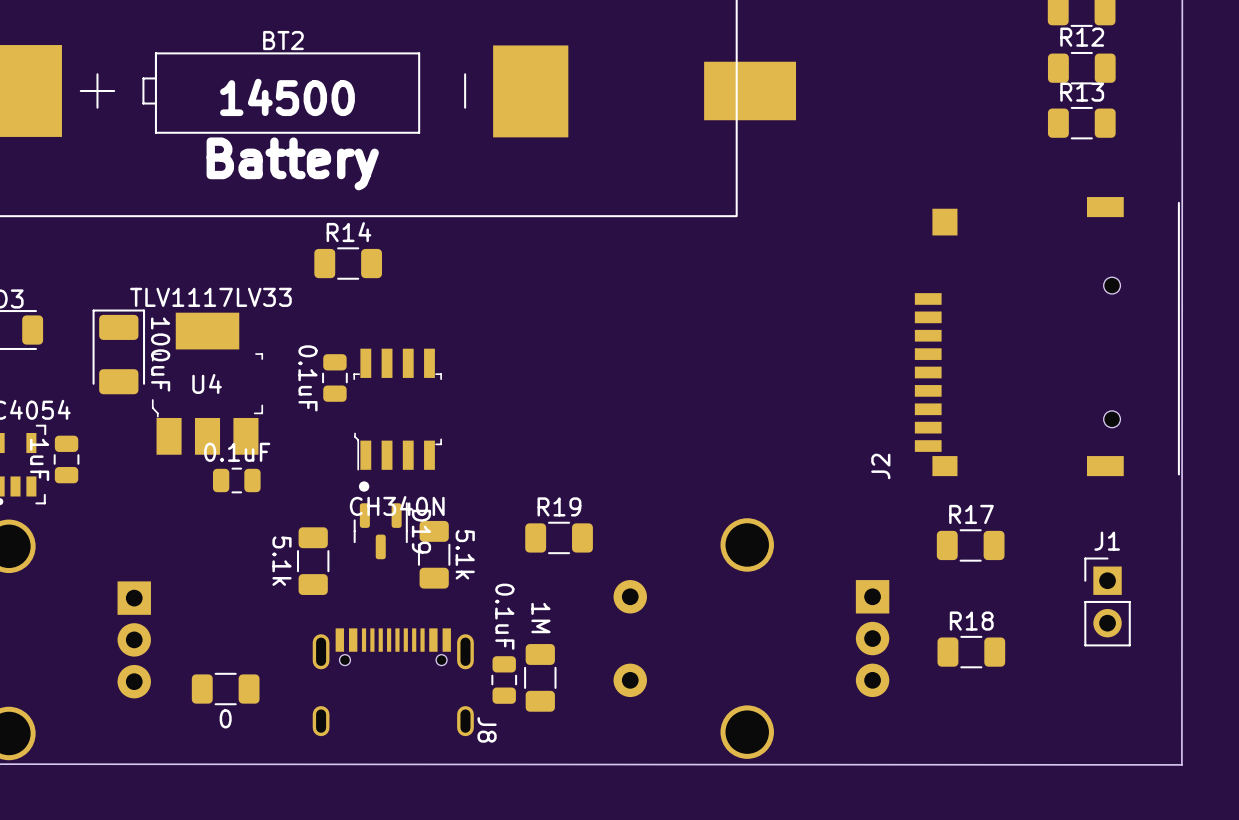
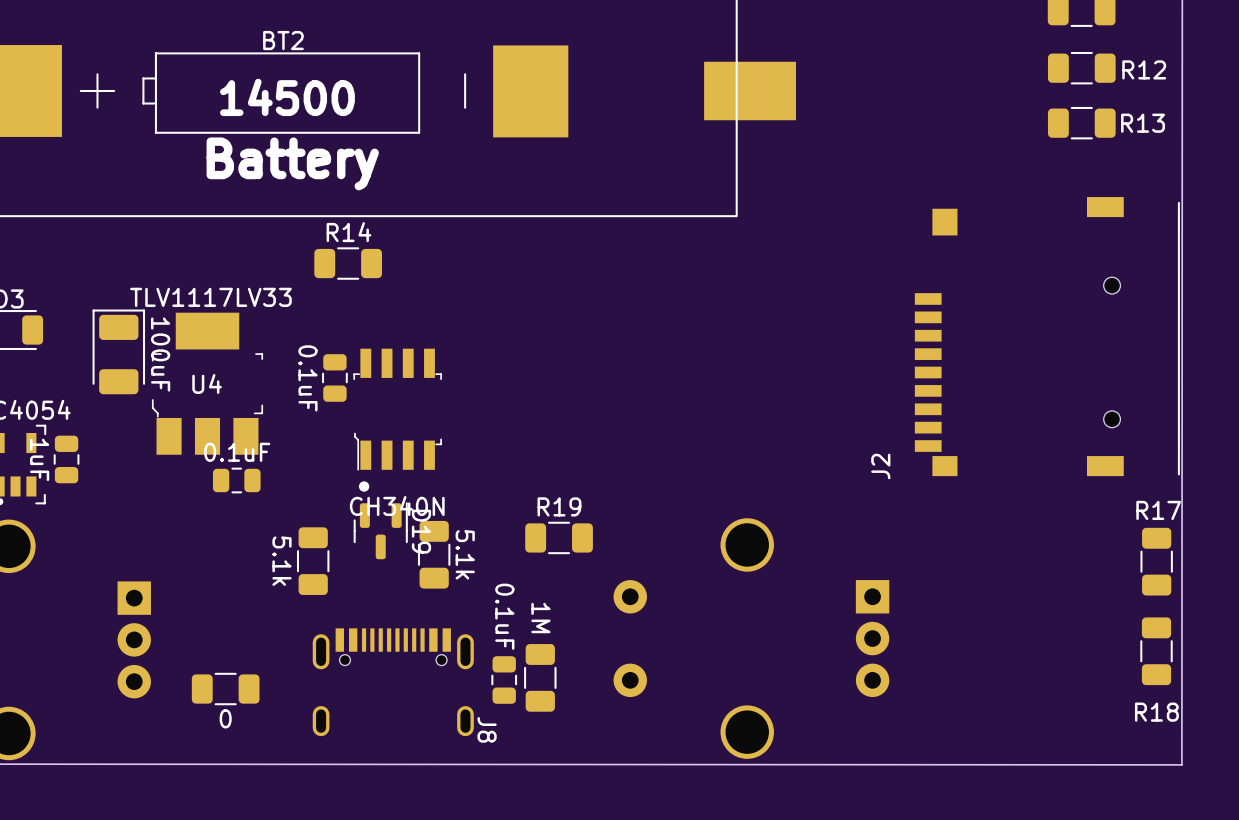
R12 name position: R12 (1082, 37) -> R12 (1144, 69)
R13 name position: R13 (1082, 92) -> R13 (1143, 123)
R17 rotation: 0° (970, 545) -> 90° clockwise (1156, 561)
R17 position: (970, 545) -> (1156, 561)
J1: (1107, 601) -> none
R18 name position: R18 (971, 621) -> R18 (1156, 712)
R18 rotation: 0° (971, 652) -> 90° clockwise (1156, 651)
R18 position: (971, 652) -> (1156, 651)

